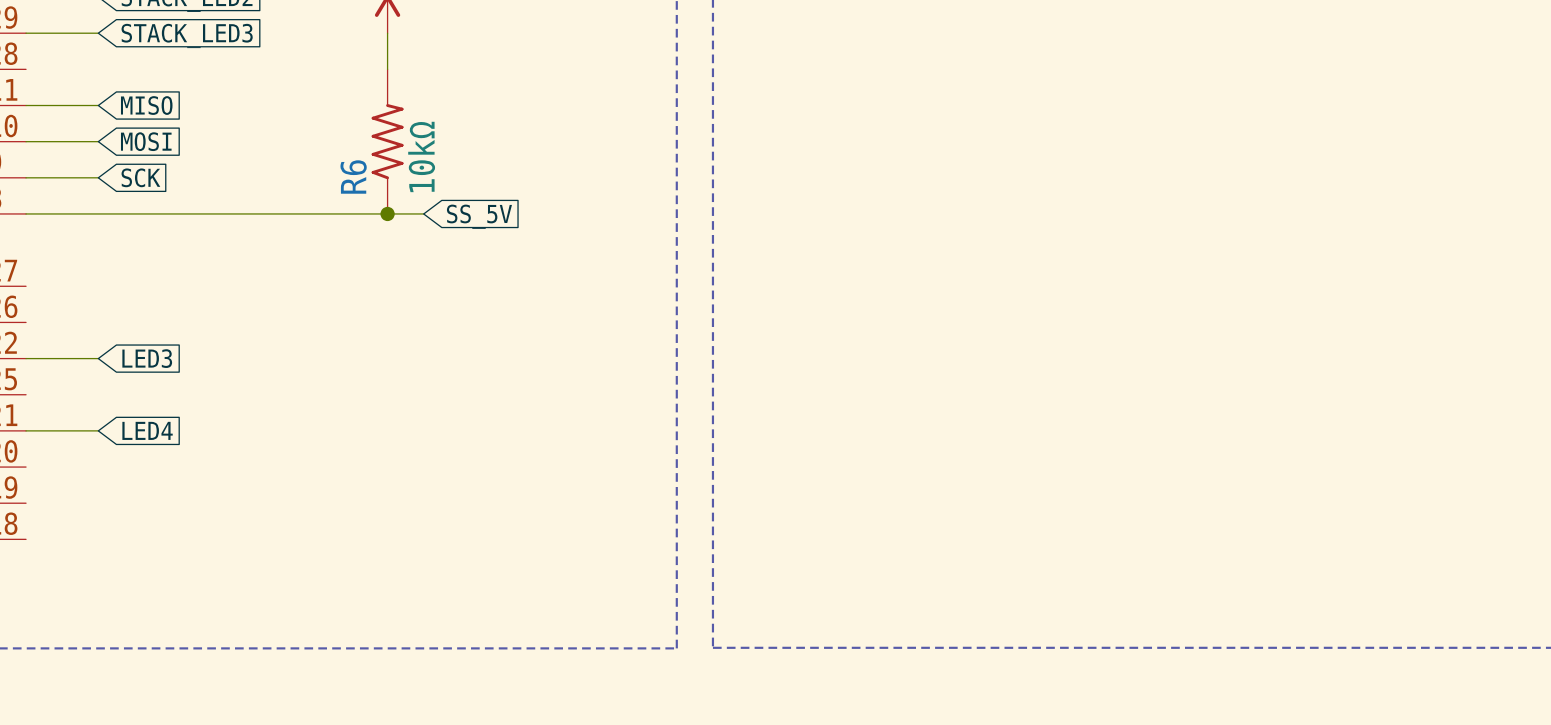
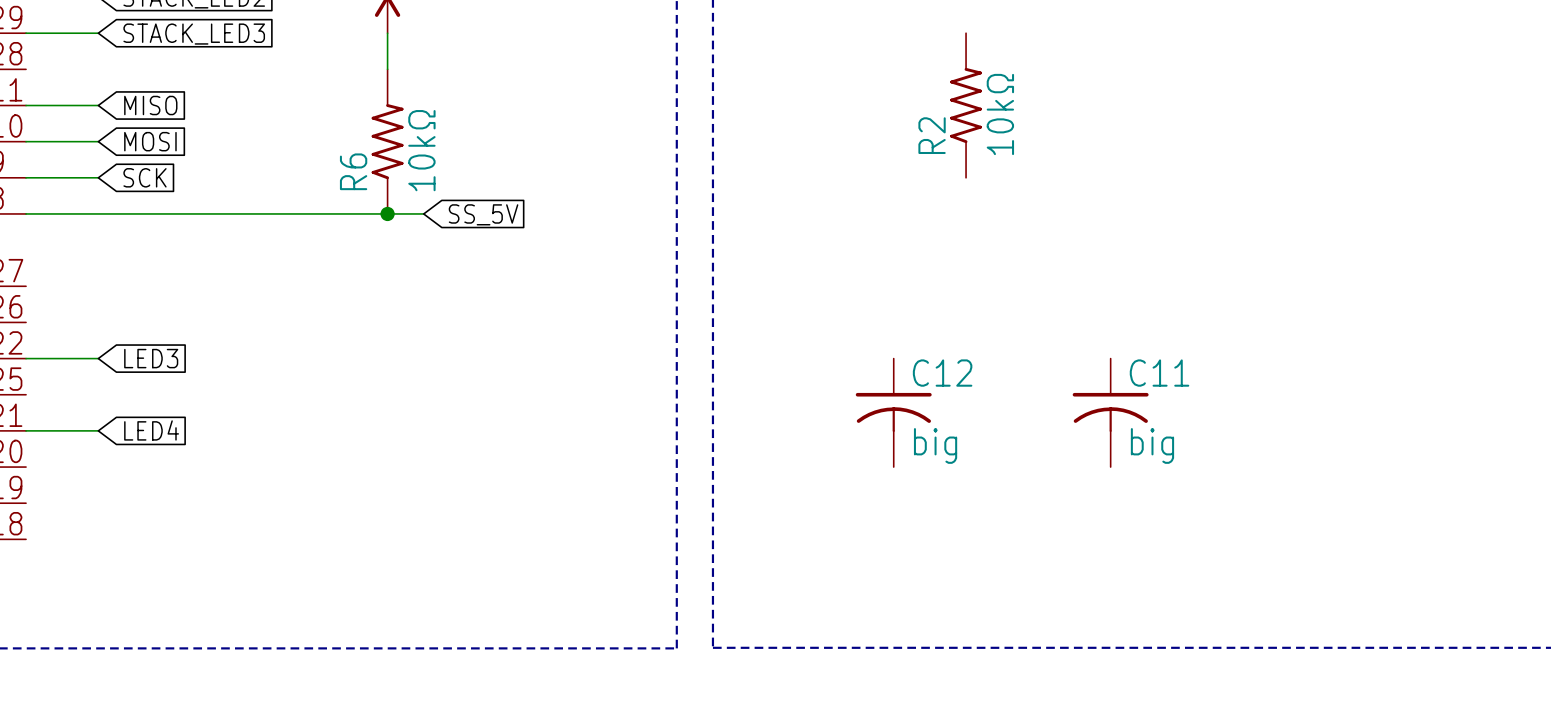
R2: none -> 10kΩ (966, 105)
C12: none -> big (893, 412)
C11: none -> big (1110, 412)

